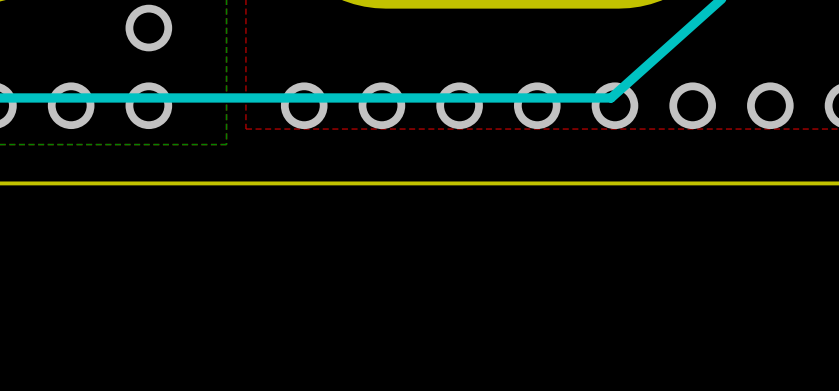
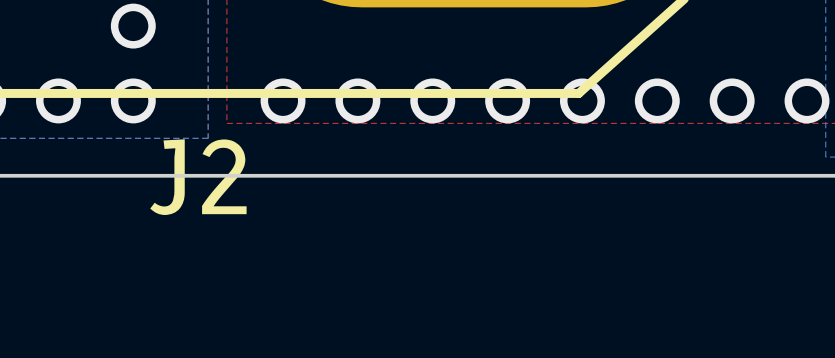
J2 name: none -> J2 (198, 177)

